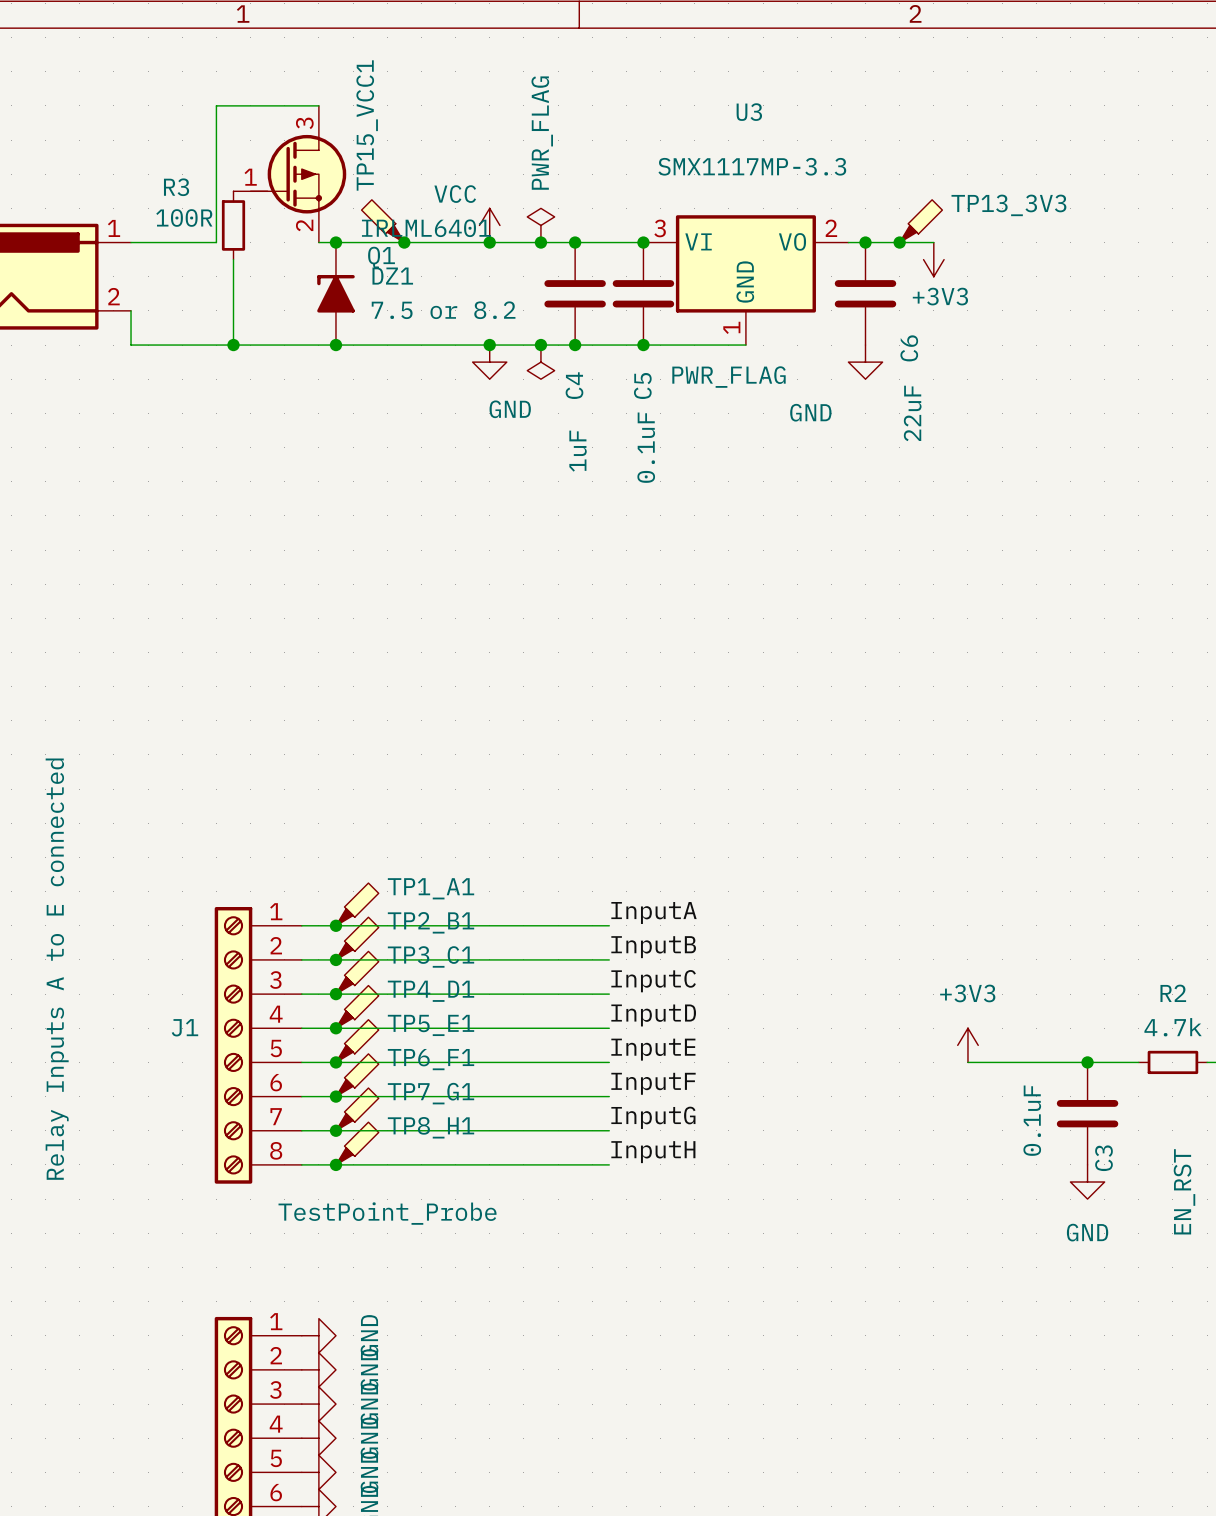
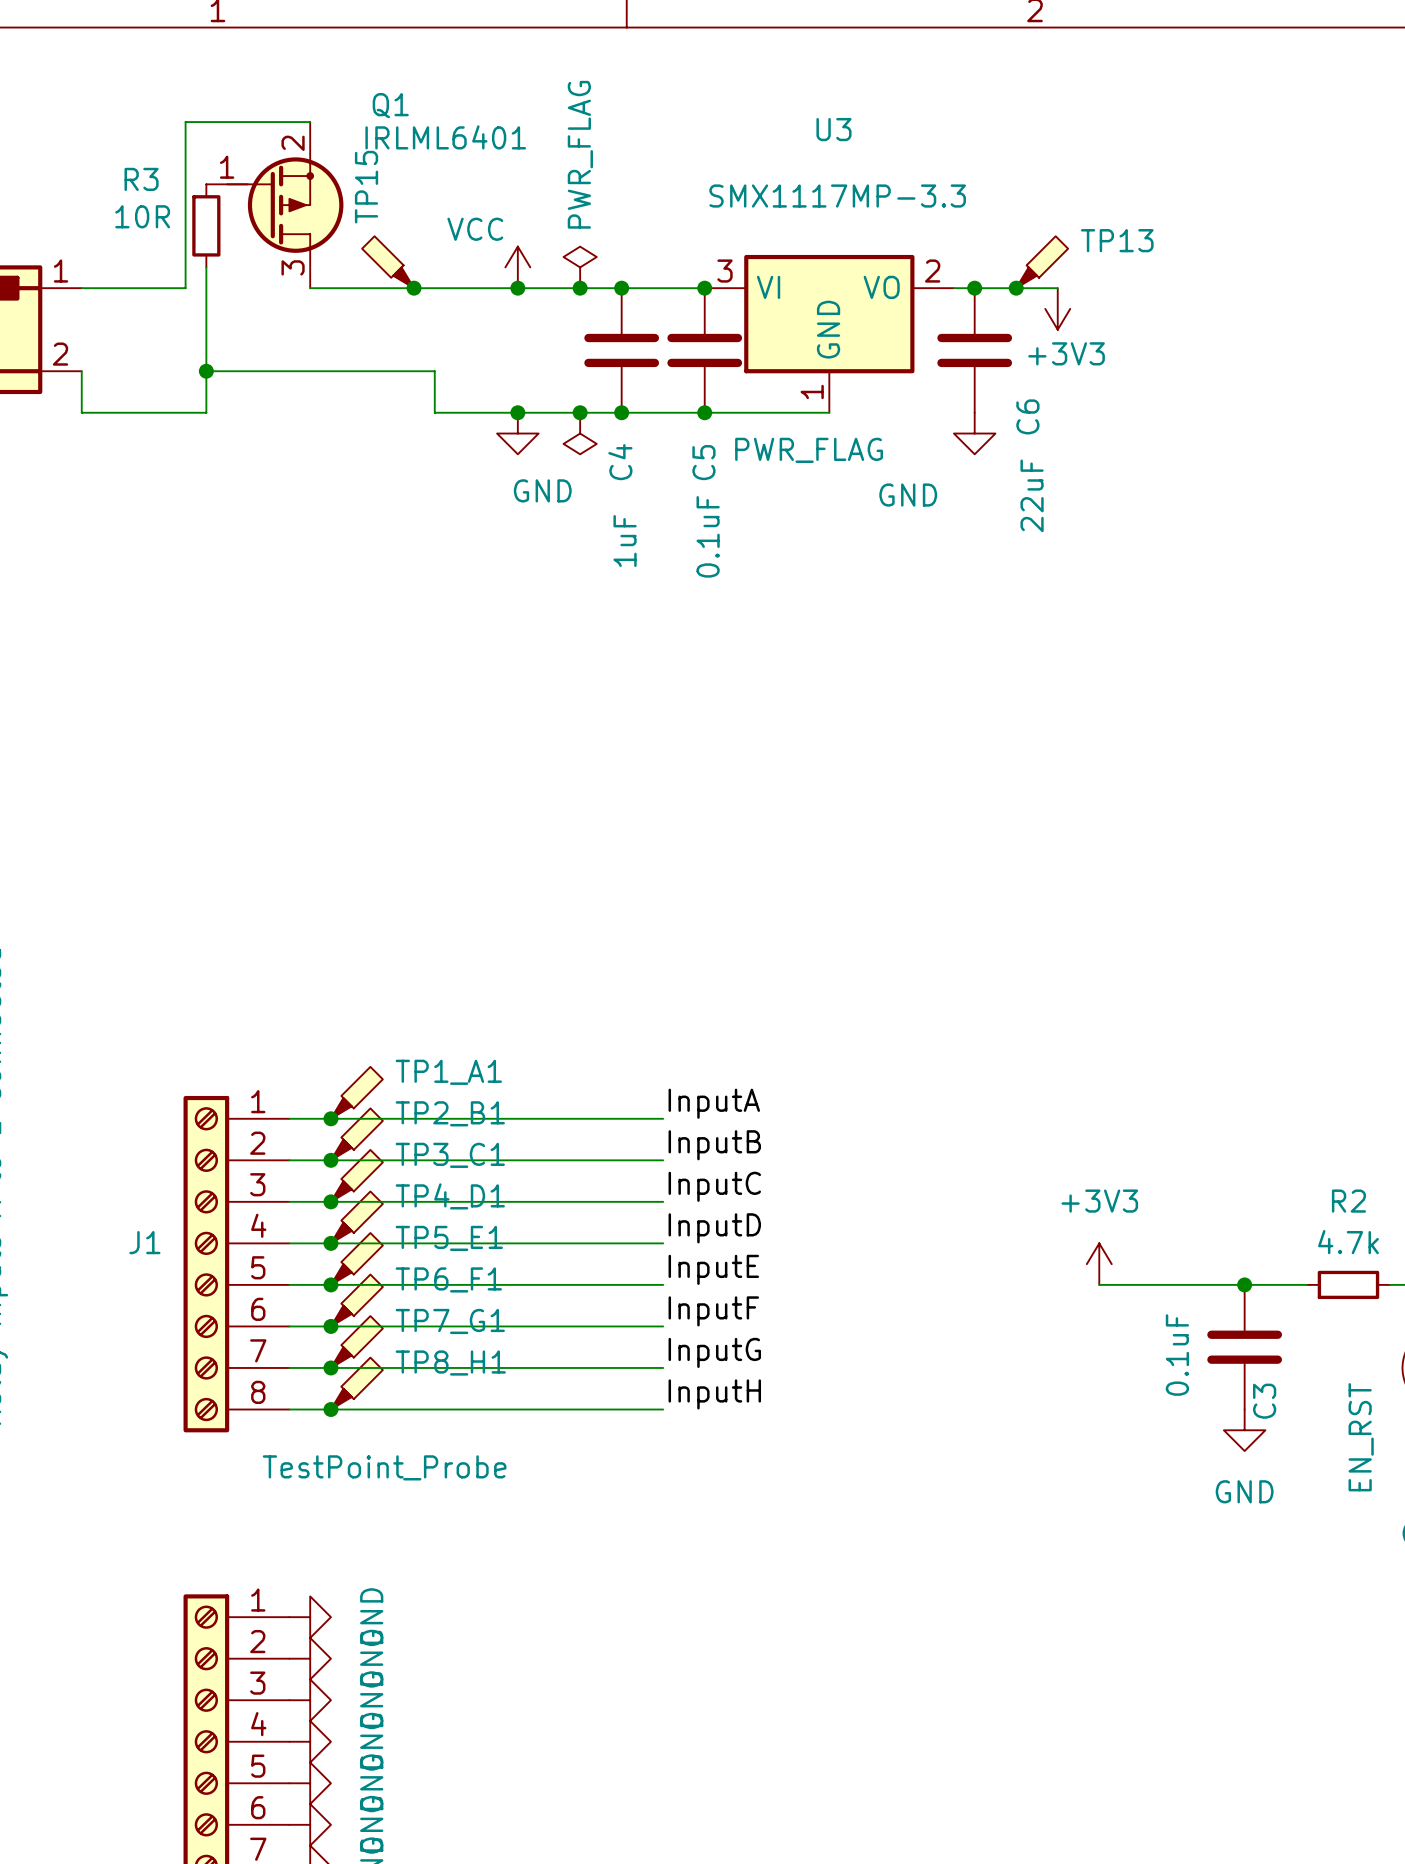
TP15_VCC1 name: TP15_VCC1 (367, 125) -> TP15 (366, 187)
Q1 flip: as is (298, 174) -> up-down (285, 205)
TP13_3V3 name: TP13_3V3 (1008, 205) -> TP13 (1117, 240)
R3 value: 100R (184, 217) -> 10R (142, 216)
wire: none -> (206, 267) (206, 308)
R3 position: (233, 225) -> (206, 225)
junction: (335, 242) -> none
DZ1: 7.5 or 8.2 (335, 293) -> none
wire: (233, 345) (421, 345) -> (206, 371) (434, 371) (434, 412)
junction position: (233, 345) -> (206, 371)
junction: (335, 345) -> none

